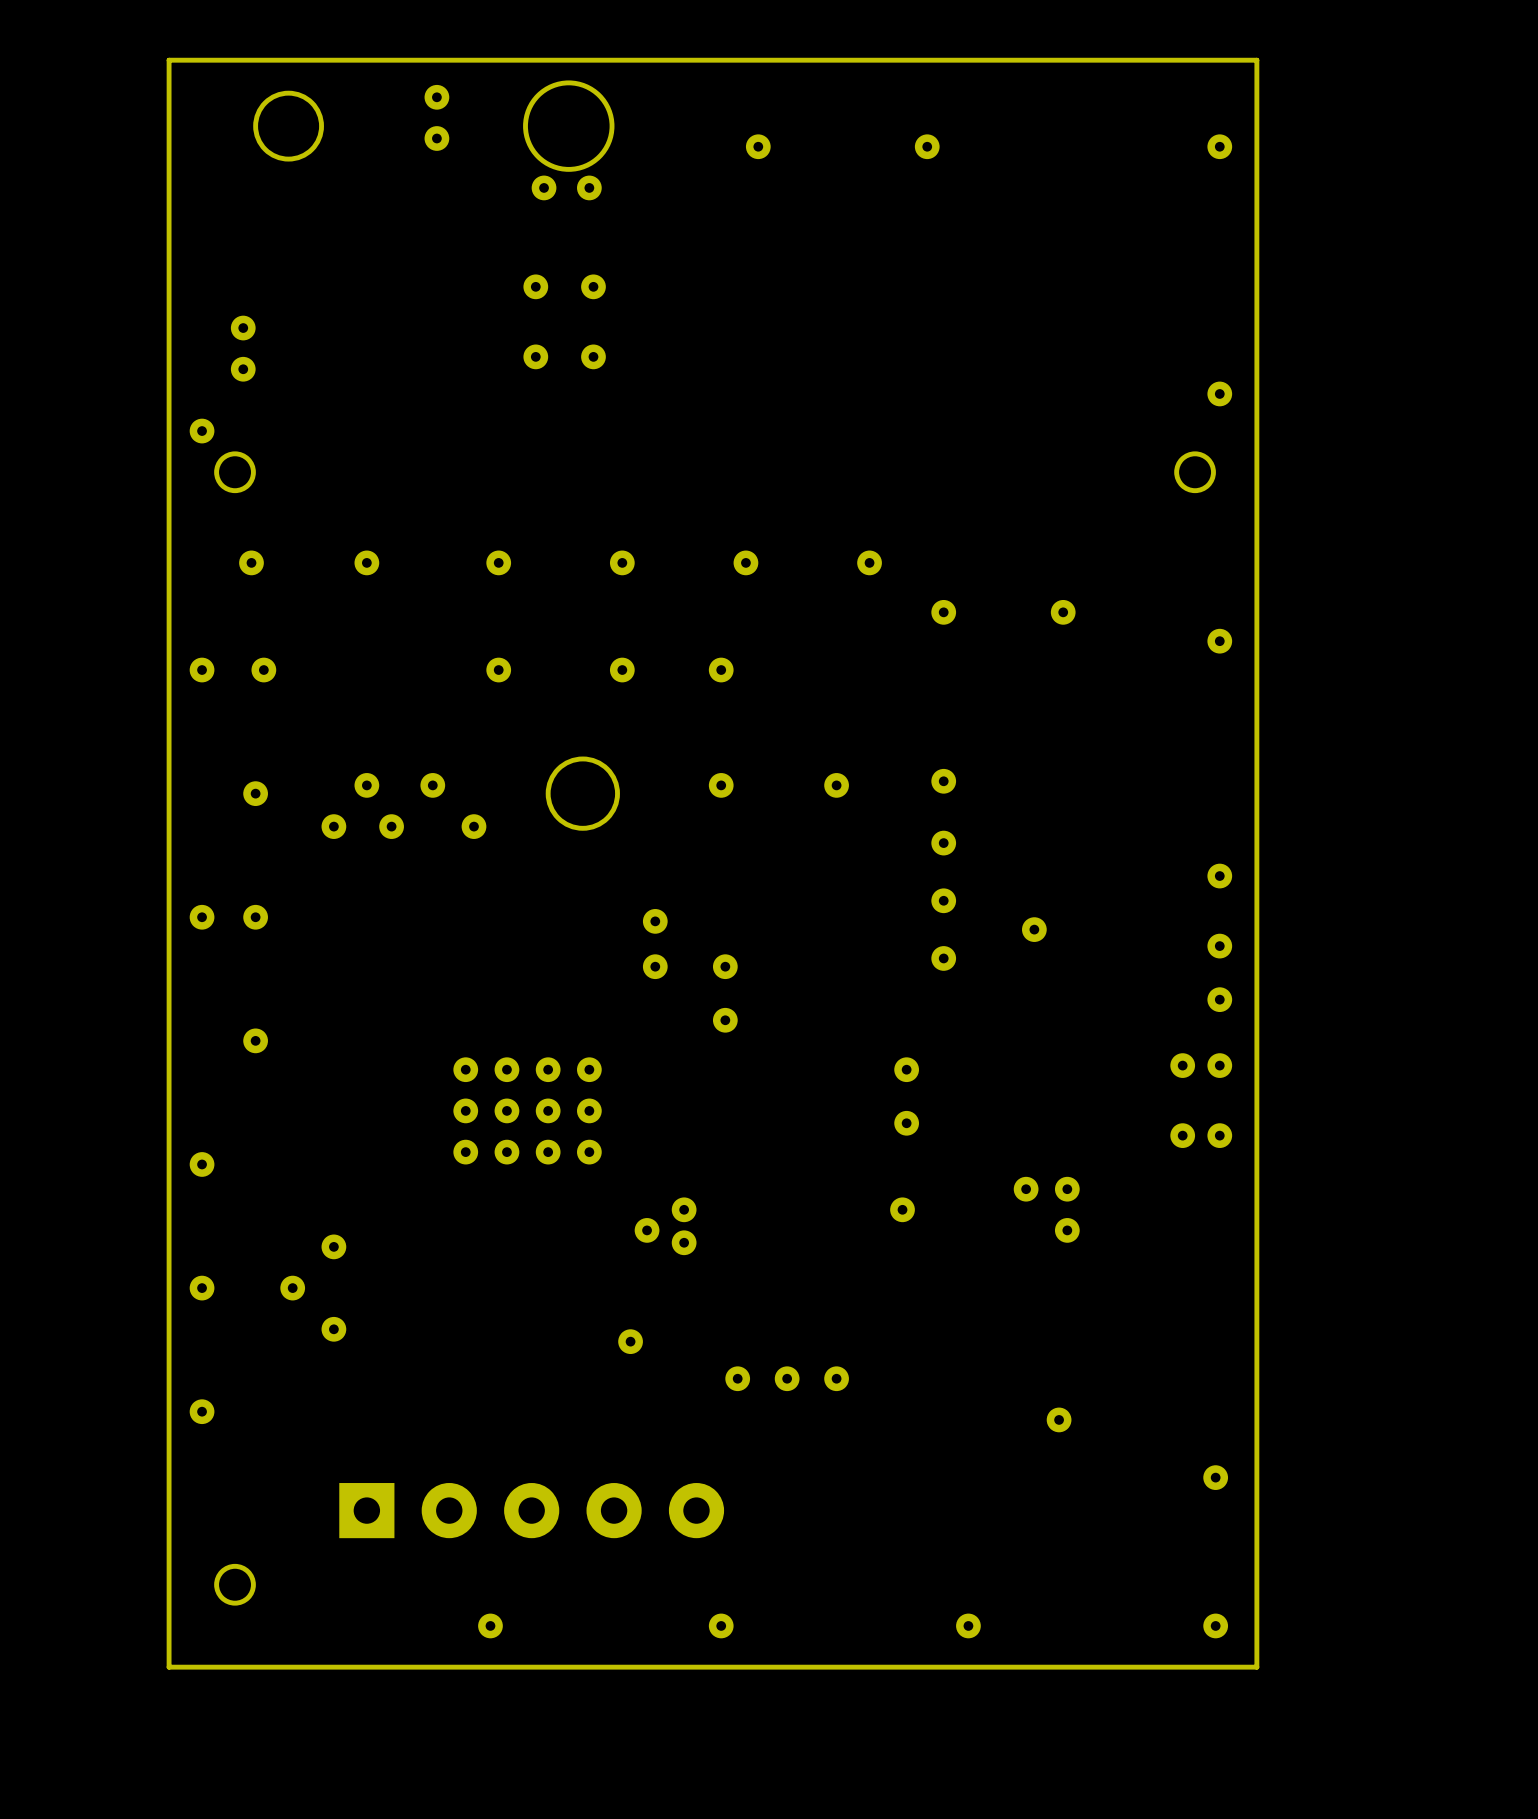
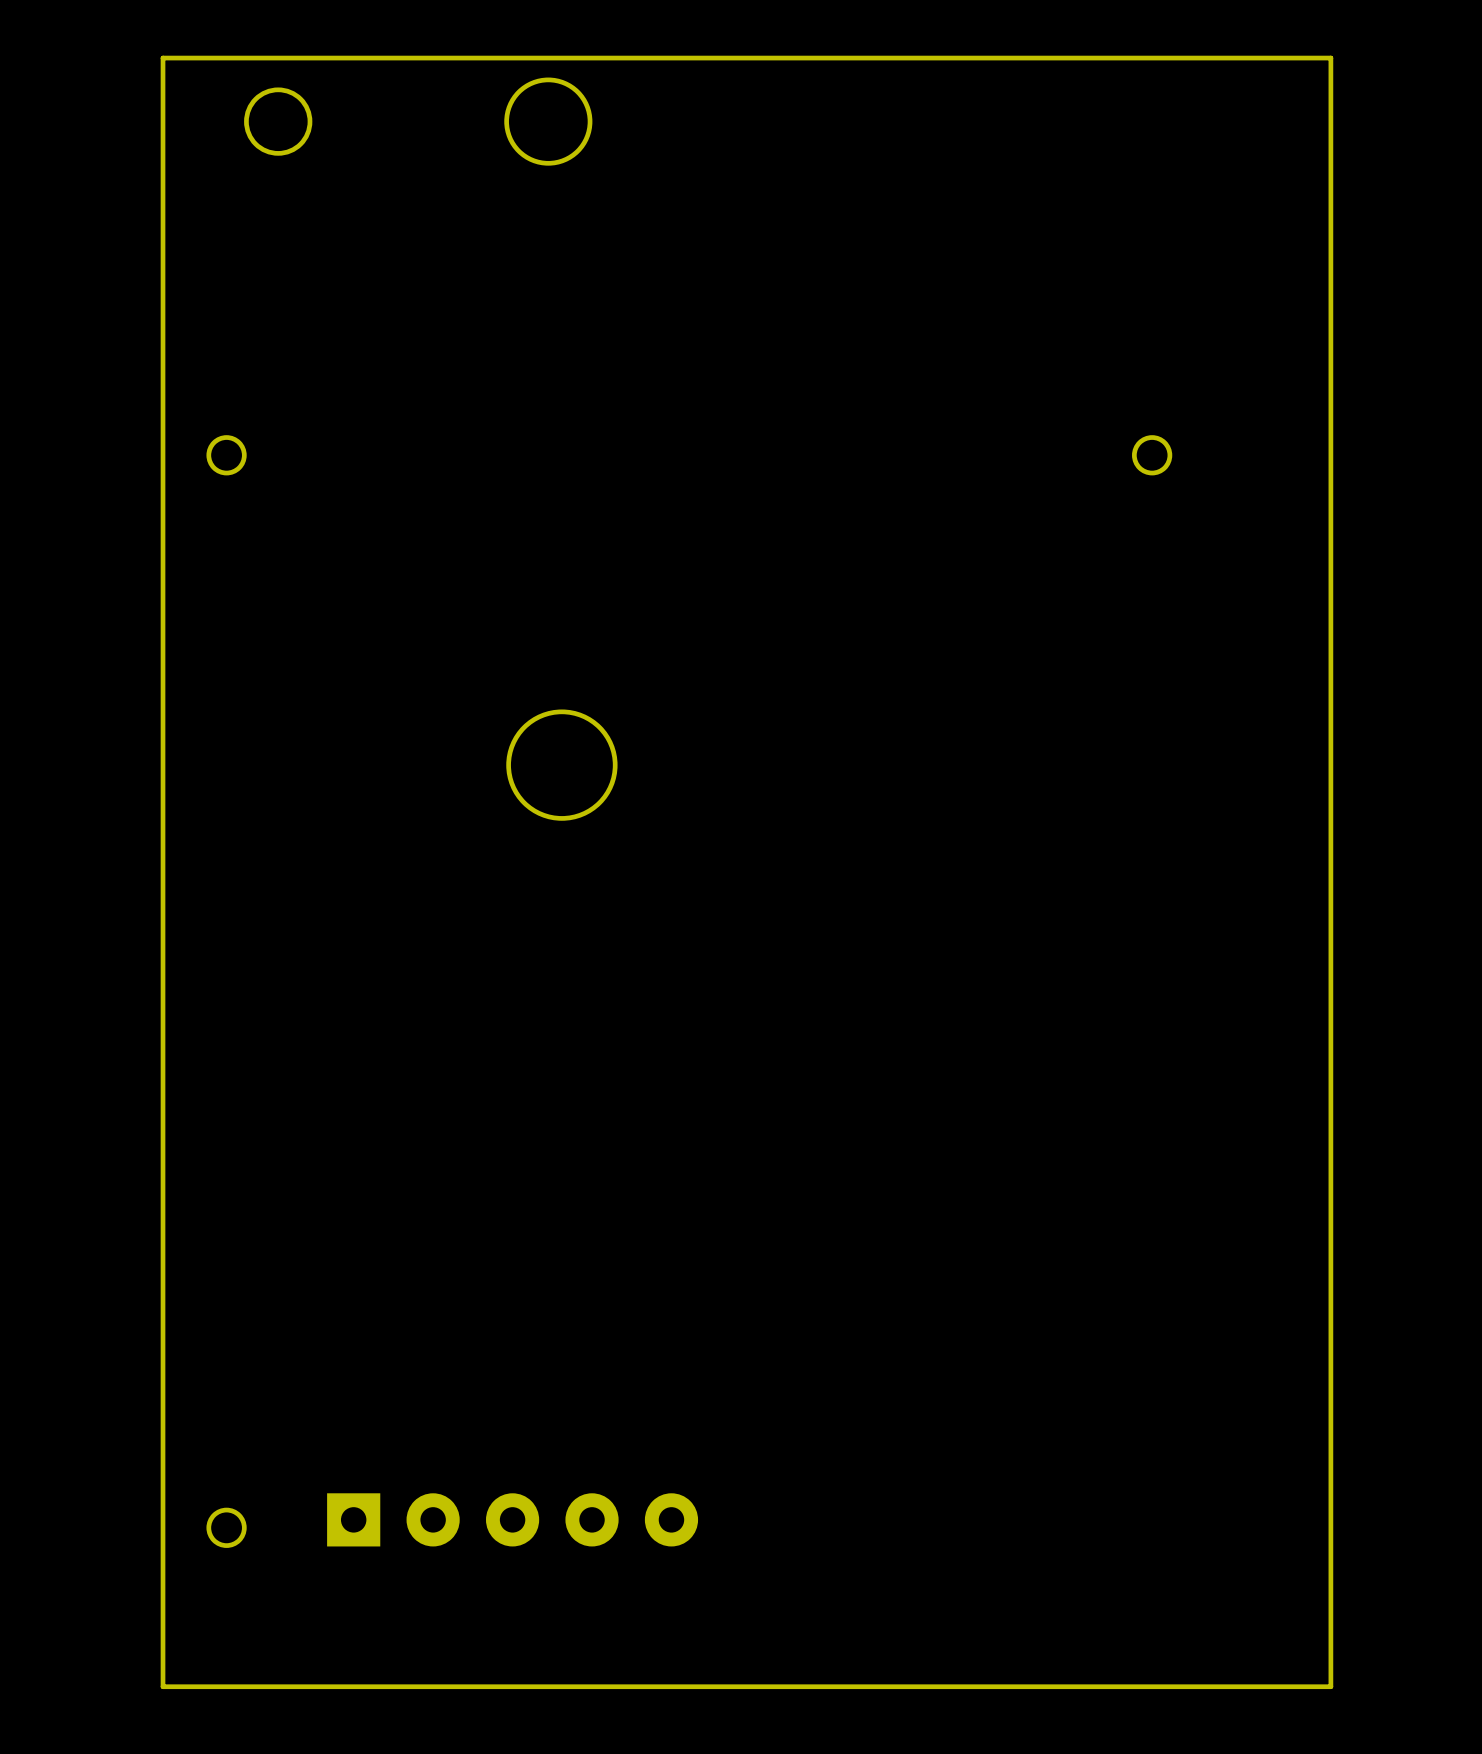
board edge: (1256, 60) (1256, 1667) (169, 1667) -> (1211, 58) (1330, 58) (1330, 1686) (163, 1686) (163, 1607)
part: (436, 97) -> none
part: (436, 138) -> none
part: (758, 146) -> none
part: (927, 146) -> none
part: (1219, 146) -> none
part: (544, 187) -> none
part: (589, 187) -> none
part: (535, 286) -> none
part: (593, 286) -> none
part: (243, 328) -> none
part: (535, 356) -> none
part: (593, 356) -> none
part: (243, 369) -> none
part: (1219, 393) -> none
part: (202, 431) -> none
part: (251, 562) -> none
part: (366, 562) -> none
part: (498, 562) -> none
part: (622, 562) -> none
part: (745, 562) -> none
part: (869, 562) -> none
part: (943, 612) -> none
part: (1063, 612) -> none
part: (1219, 641) -> none
part: (202, 670) -> none
part: (263, 670) -> none
part: (498, 670) -> none
part: (622, 670) -> none
part: (721, 670) -> none
round board edge size: [545, 756, 620, 831] -> [506, 709, 618, 821]
part: (943, 781) -> none
part: (366, 785) -> none
part: (432, 785) -> none
part: (721, 785) -> none
part: (836, 785) -> none
part: (255, 793) -> none
part: (333, 826) -> none
part: (391, 826) -> none
part: (473, 826) -> none
part: (943, 843) -> none
part: (1219, 876) -> none
part: (943, 900) -> none
part: (202, 917) -> none
part: (255, 917) -> none
part: (655, 921) -> none
part: (1034, 929) -> none
part: (1219, 946) -> none
part: (943, 958) -> none
part: (655, 966) -> none
part: (725, 966) -> none
part: (1219, 999) -> none
part: (725, 1020) -> none
part: (255, 1040) -> none
part: (1182, 1065) -> none
part: (1219, 1065) -> none
part: (465, 1069) -> none
part: (506, 1069) -> none
part: (548, 1069) -> none
part: (589, 1069) -> none
part: (906, 1069) -> none
part: (465, 1110) -> none
part: (506, 1110) -> none
part: (548, 1110) -> none
part: (589, 1110) -> none
part: (906, 1123) -> none
part: (1182, 1135) -> none
part: (1219, 1135) -> none
part: (465, 1152) -> none
part: (506, 1152) -> none
part: (548, 1152) -> none
part: (589, 1152) -> none
part: (202, 1164) -> none
part: (1026, 1189) -> none
part: (1067, 1189) -> none
part: (684, 1209) -> none
part: (902, 1209) -> none
part: (647, 1230) -> none
part: (1067, 1230) -> none
part: (684, 1242) -> none
part: (333, 1246) -> none
part: (202, 1288) -> none
part: (292, 1288) -> none
part: (333, 1329) -> none
part: (630, 1341) -> none
part: (737, 1378) -> none
part: (787, 1378) -> none
part: (836, 1378) -> none
part: (202, 1411) -> none
part: (1059, 1419) -> none
part: (1215, 1477) -> none
part position: (531, 1510) -> (512, 1519)
part: (490, 1625) -> none
part: (721, 1625) -> none
part: (968, 1625) -> none
part: (1215, 1625) -> none

